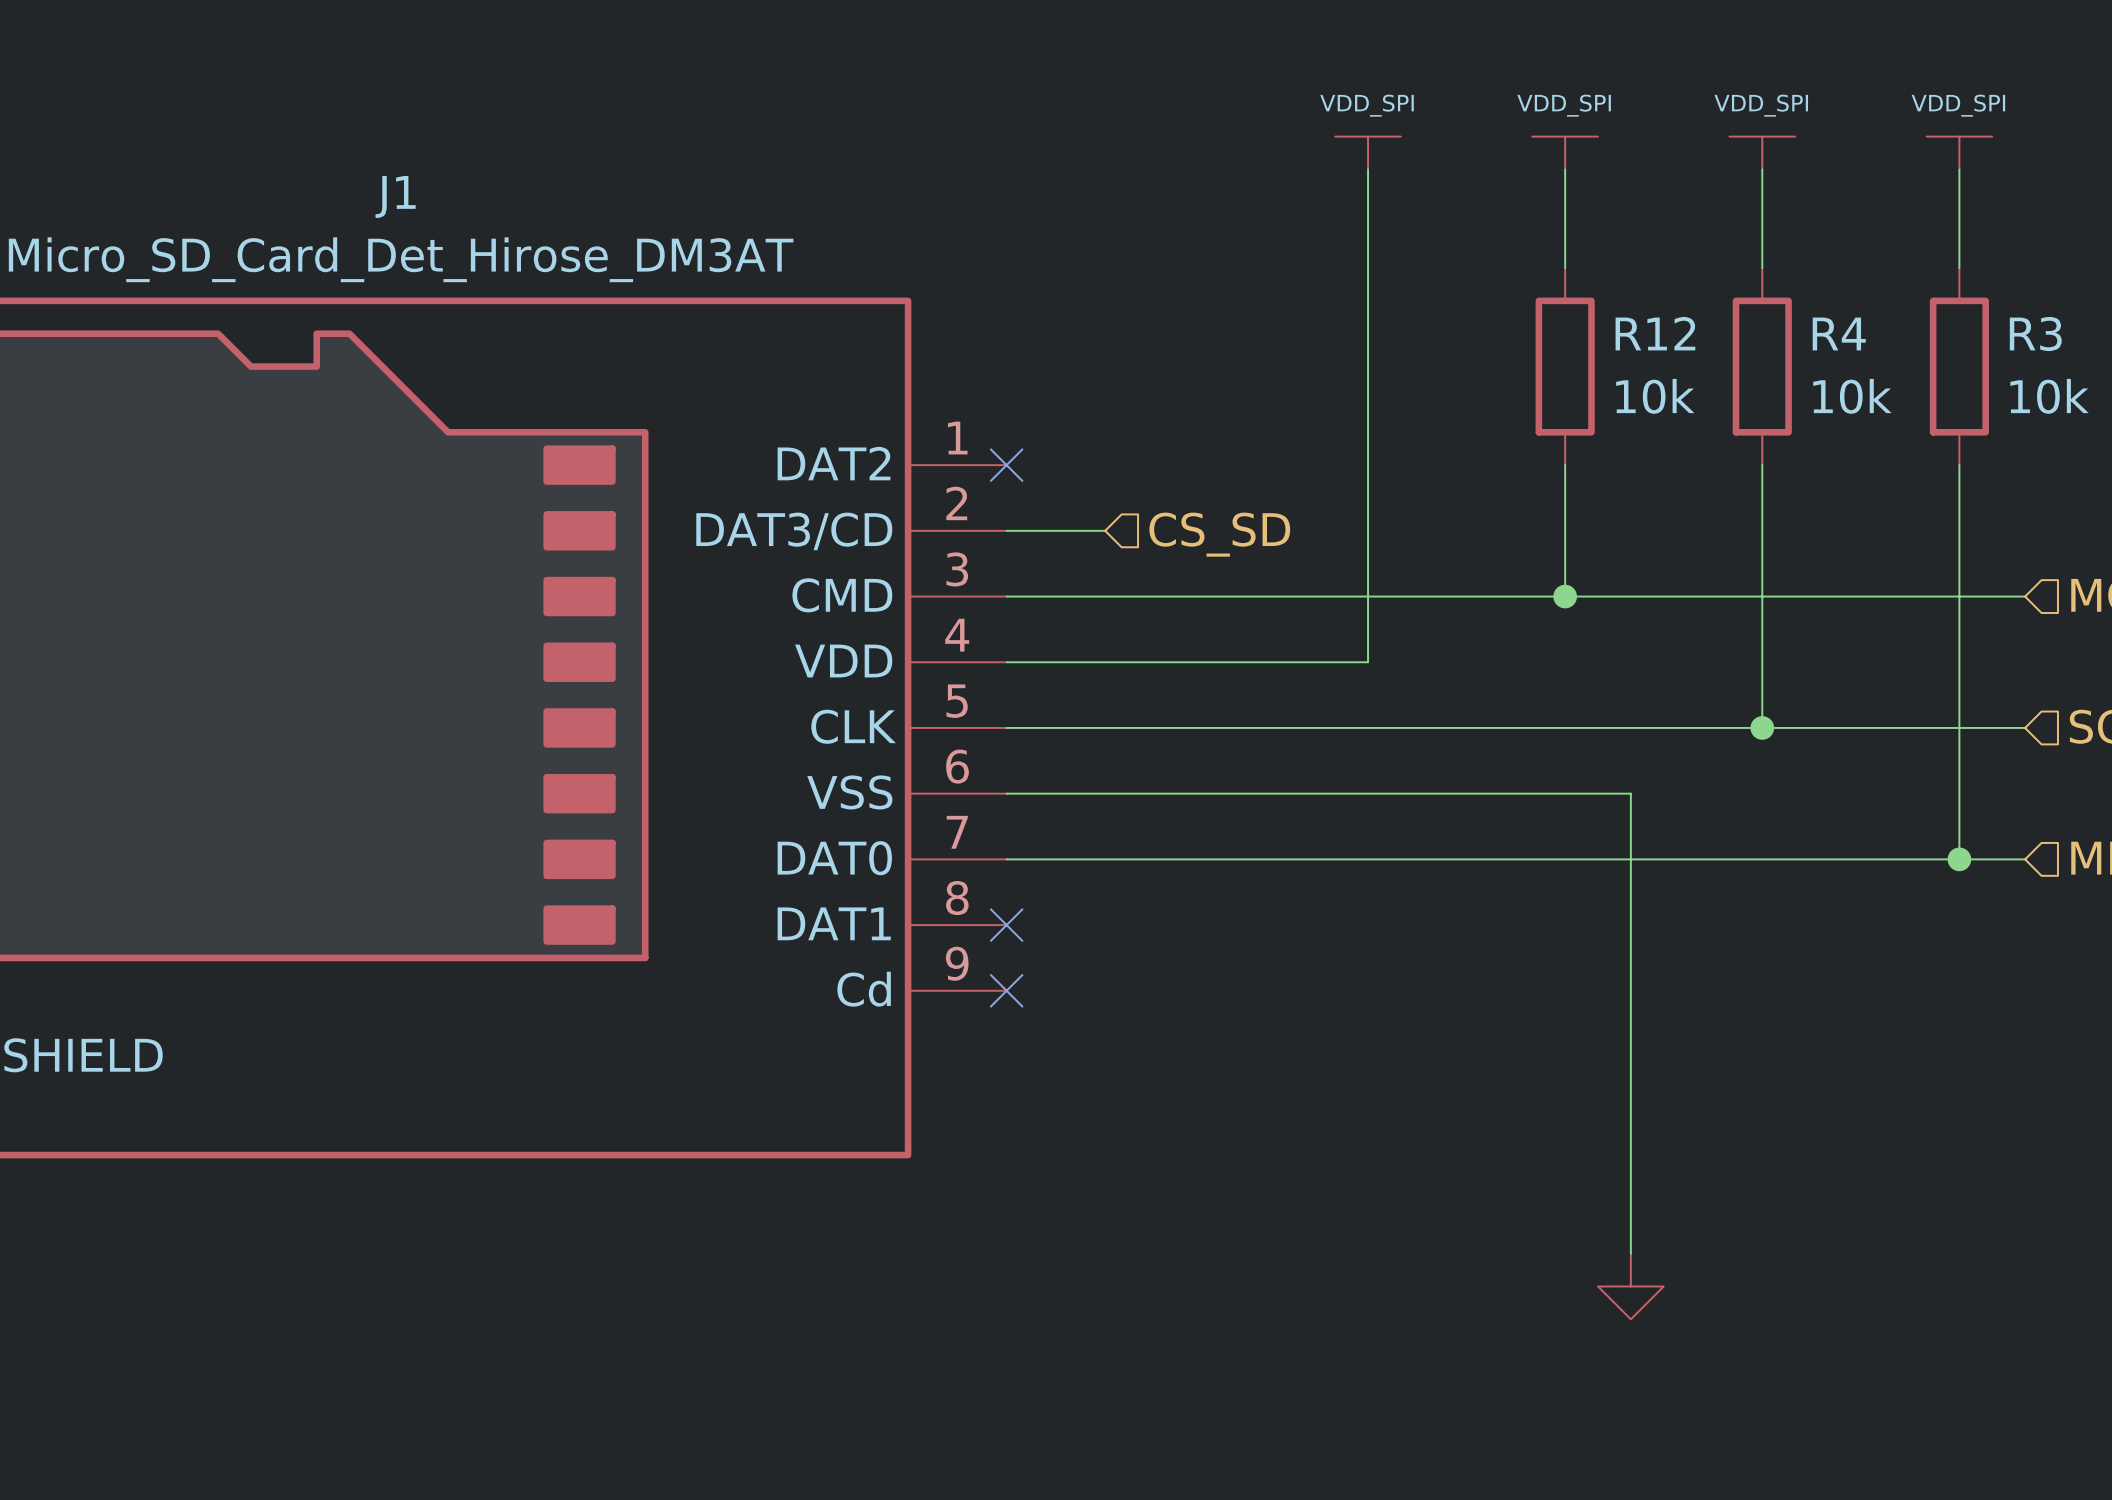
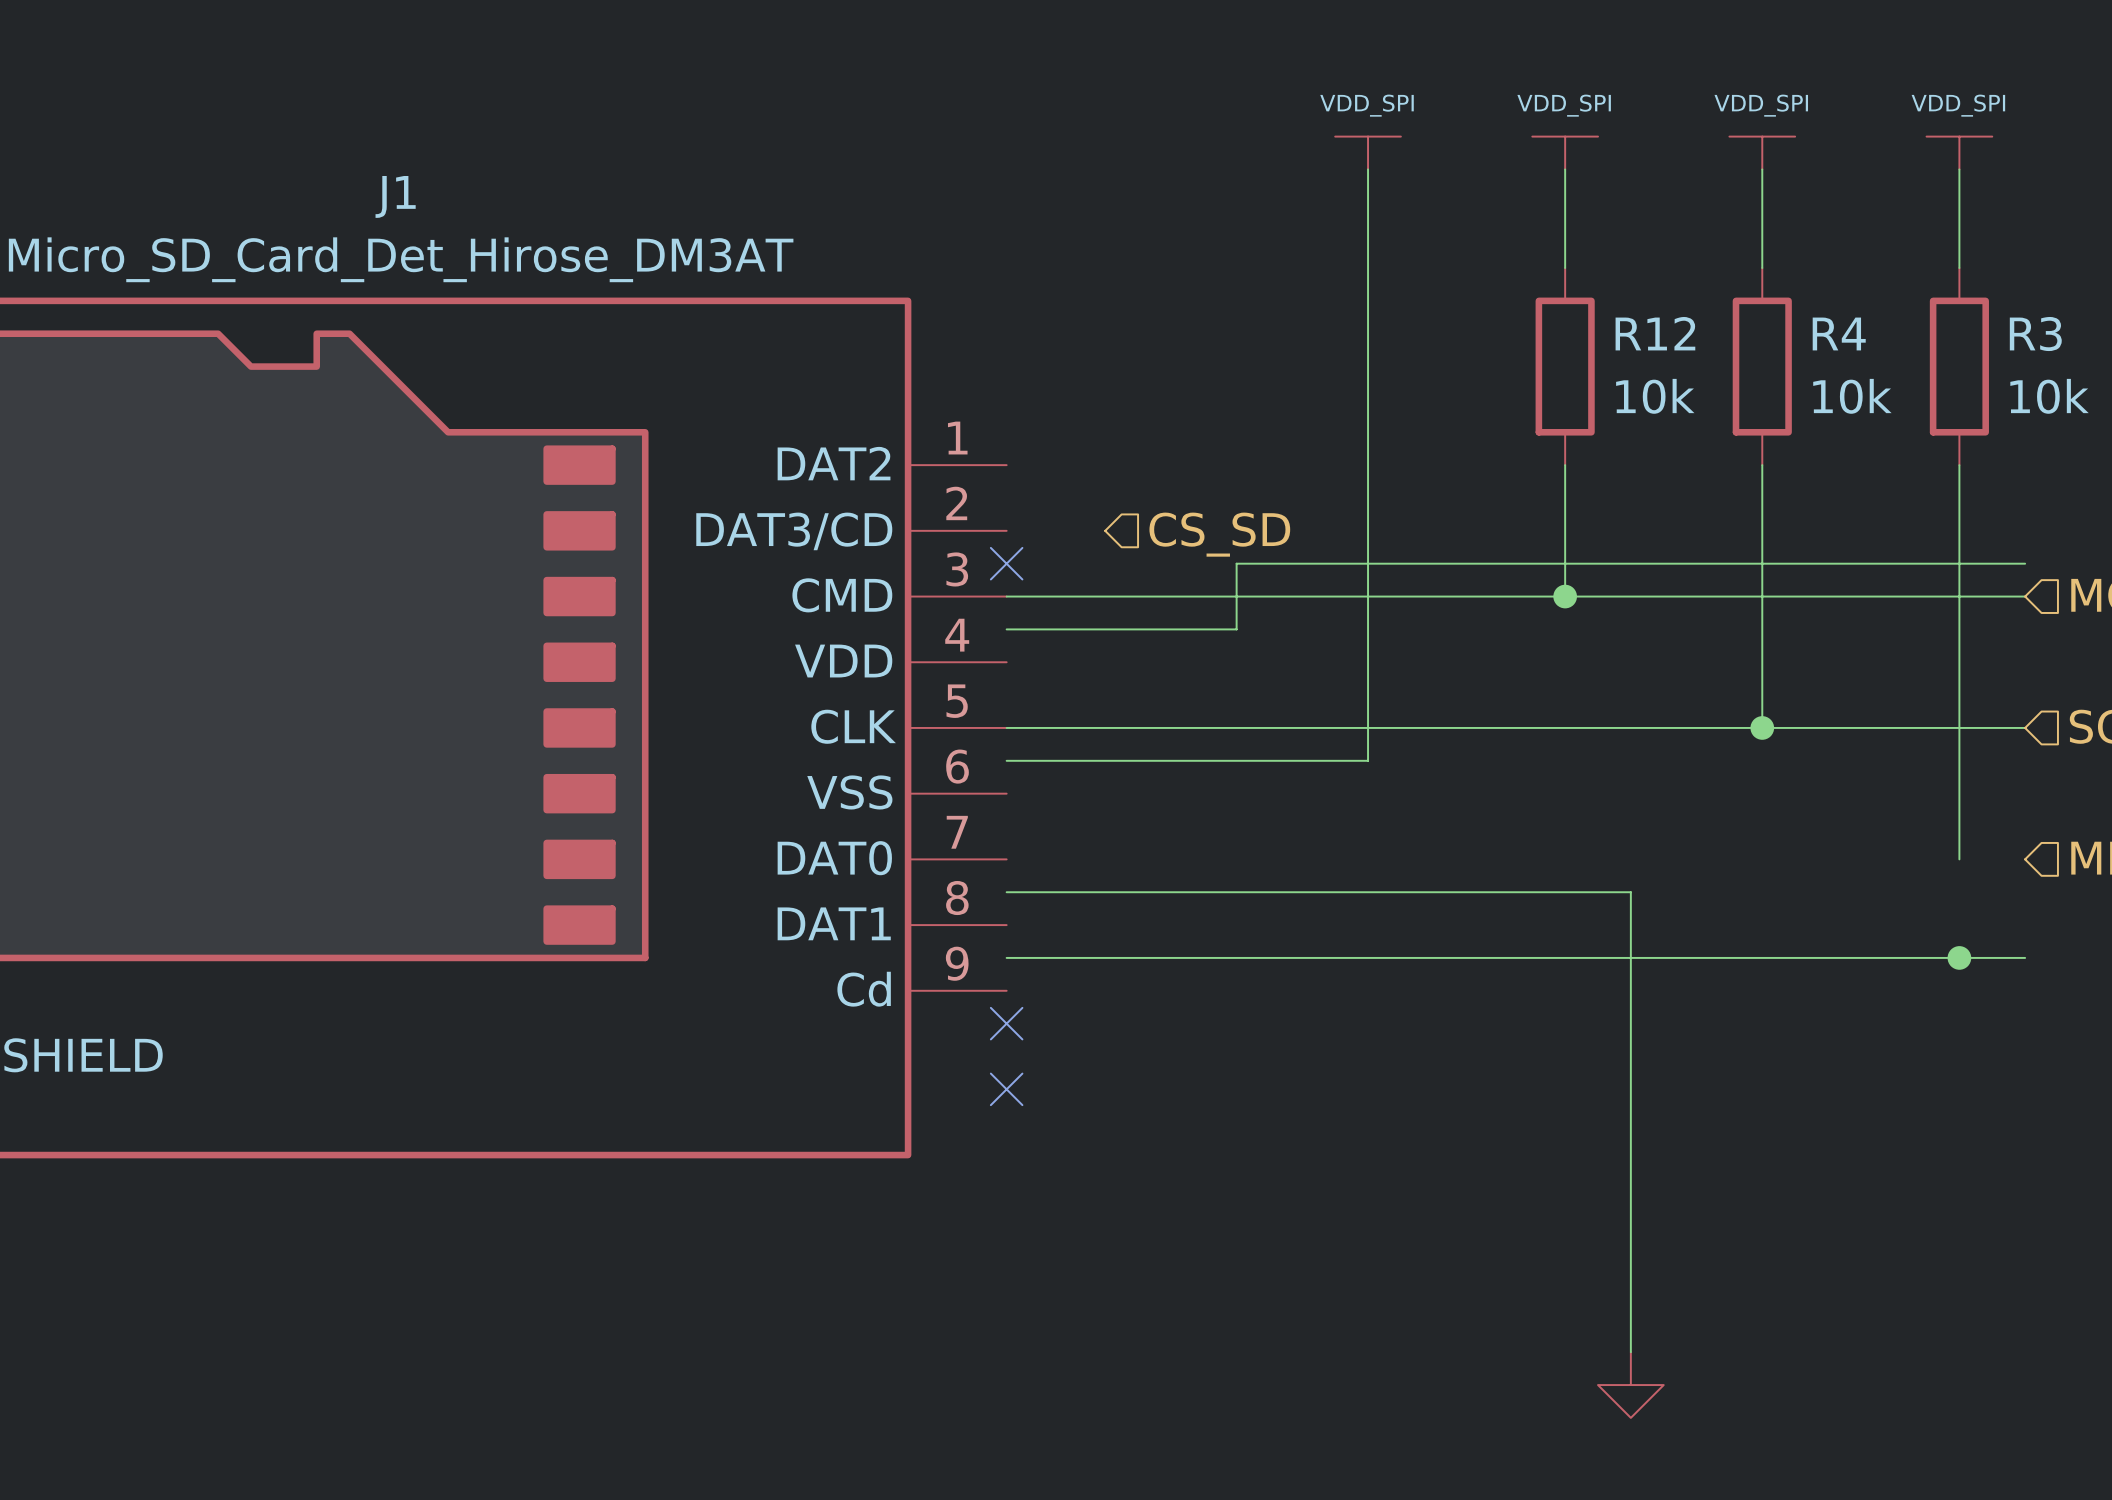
no-connect mark position: (1006, 465) -> (1006, 563)
wire: (1006, 530) (1105, 530) -> none
wire: none -> (2025, 563) (1236, 563) (1236, 629) (1006, 629)
wire: (1006, 662) (1368, 662) -> (1006, 760) (1368, 760) (1368, 662)
wire: (1006, 793) (1630, 793) (1630, 892) -> (1006, 892) (1630, 892)
wire: (1006, 859) (2025, 859) -> (1006, 957) (2025, 957)
junction position: (1959, 859) -> (1959, 957)
no-connect mark: (1006, 925) -> none
no-connect mark position: (1006, 990) -> (1006, 1023)
no-connect mark: none -> (1006, 1089)
wire: none -> (1630, 1253) (1630, 1352)
power symbol position: (1630, 1286) -> (1630, 1385)

